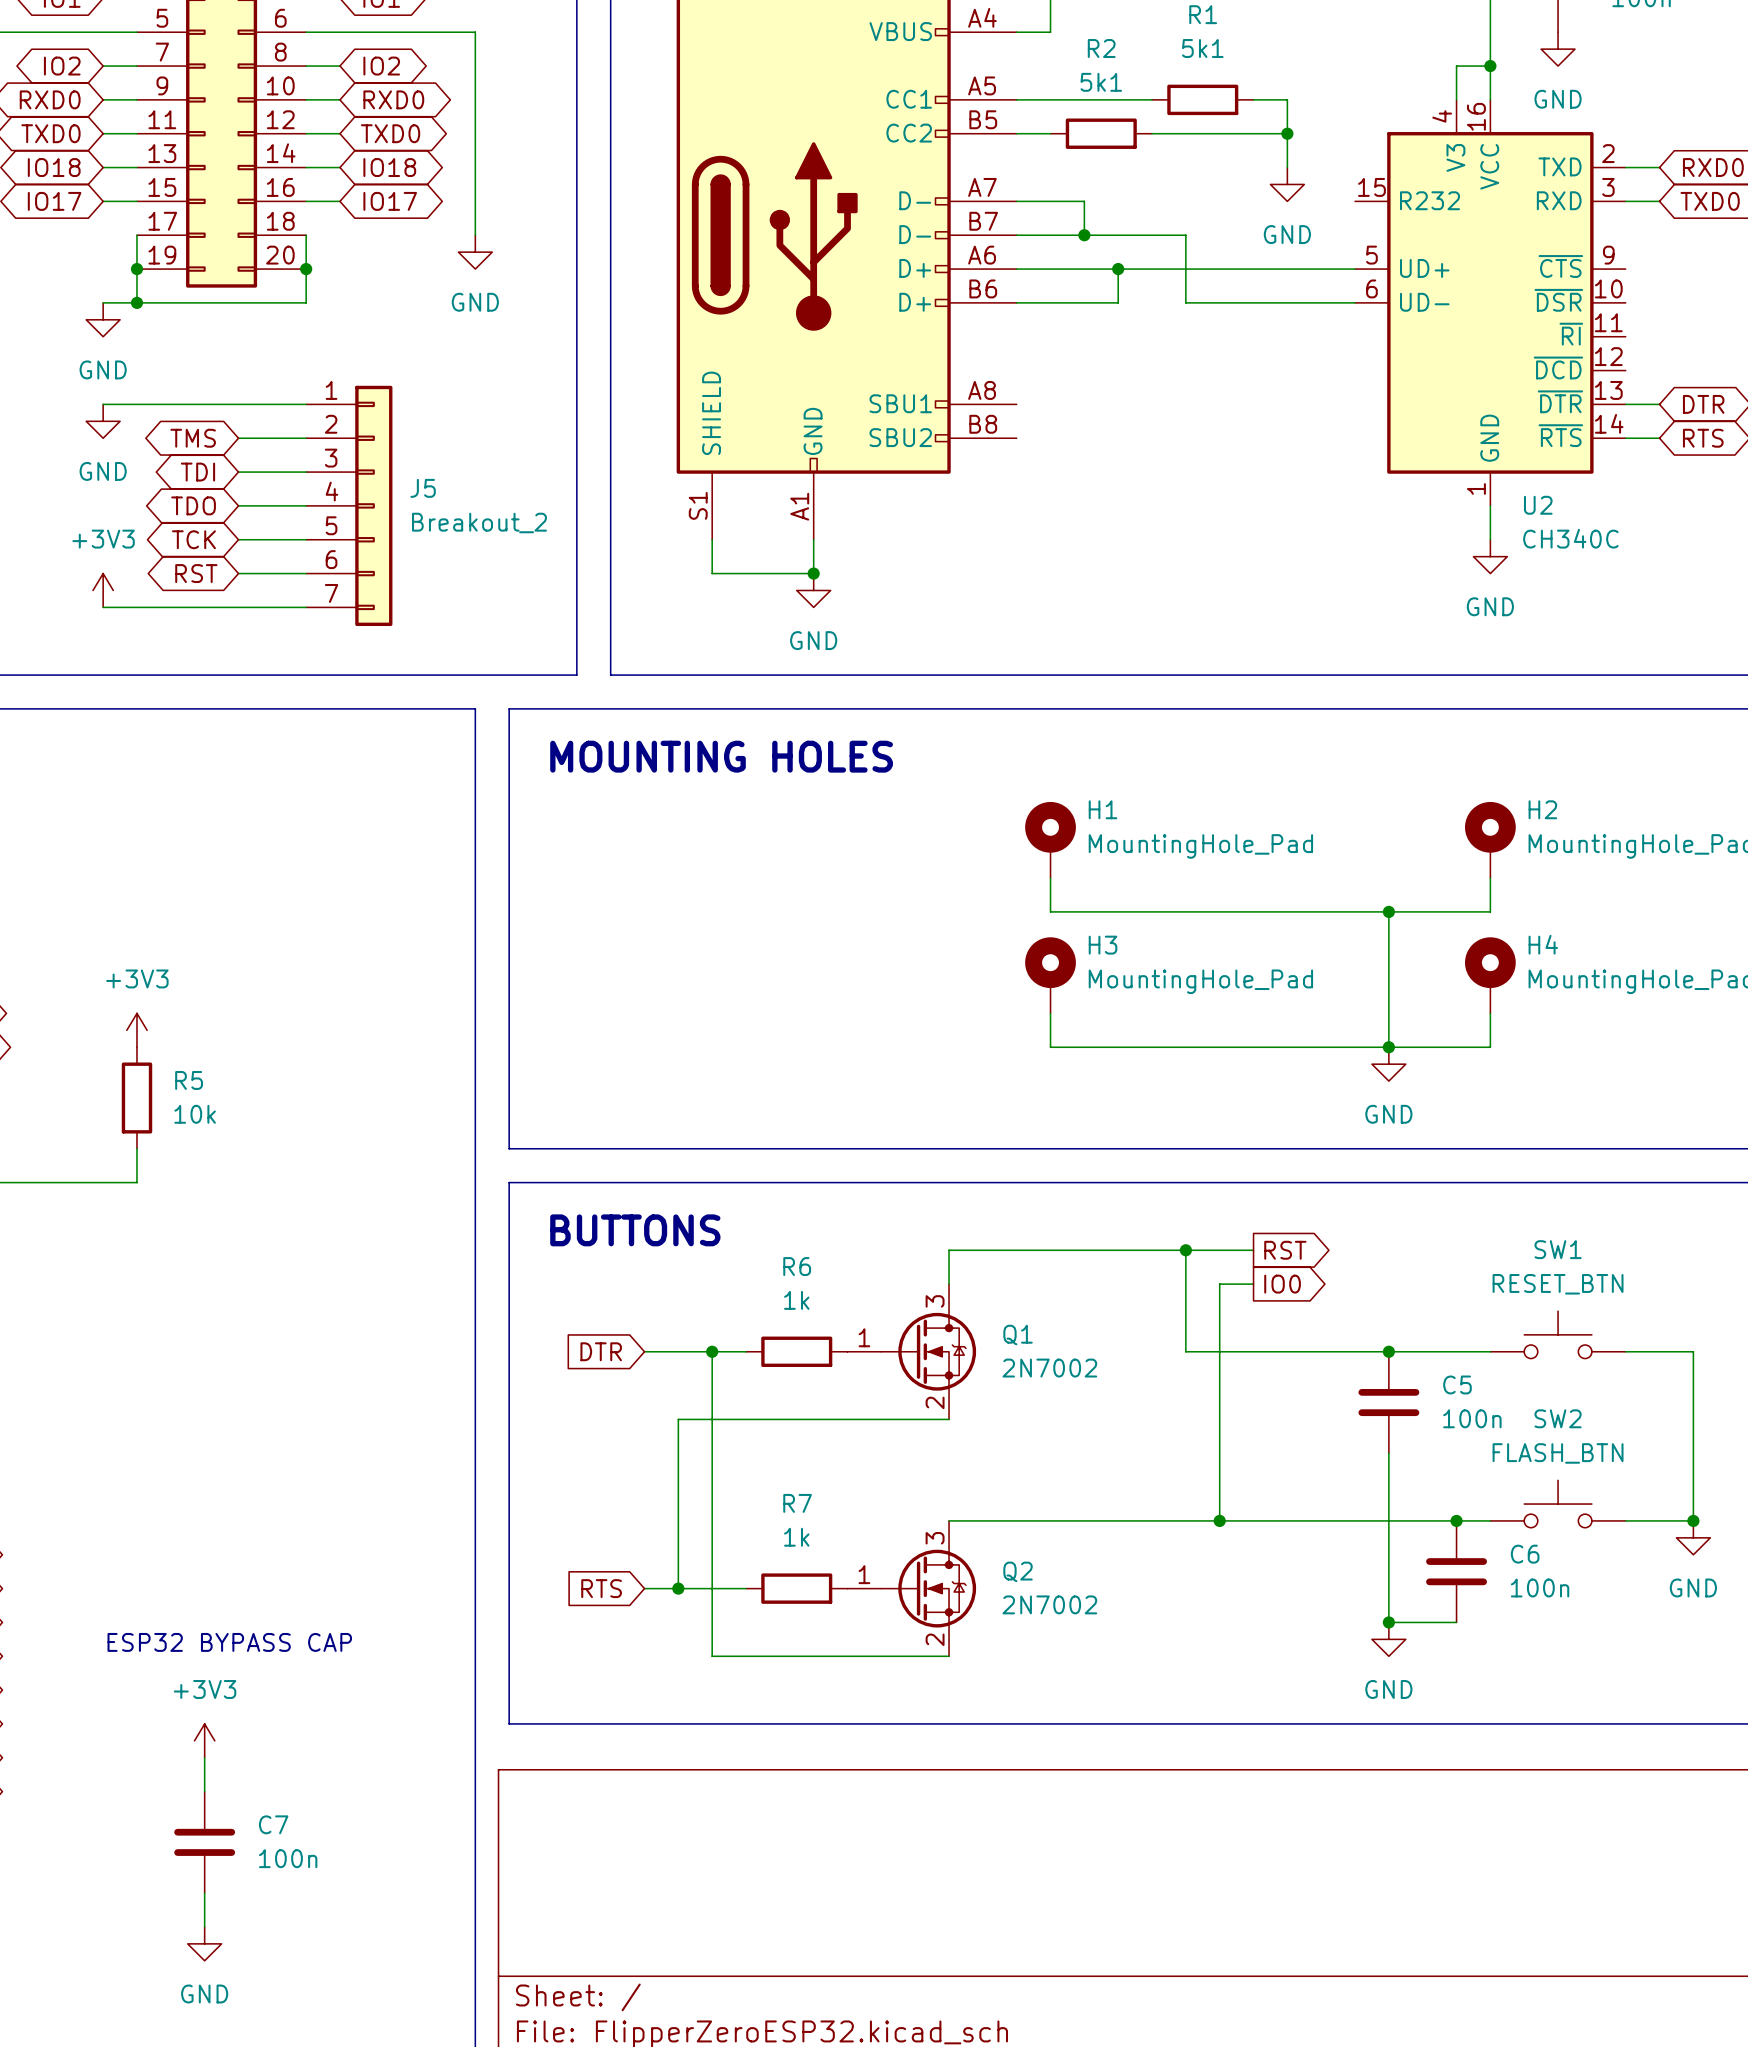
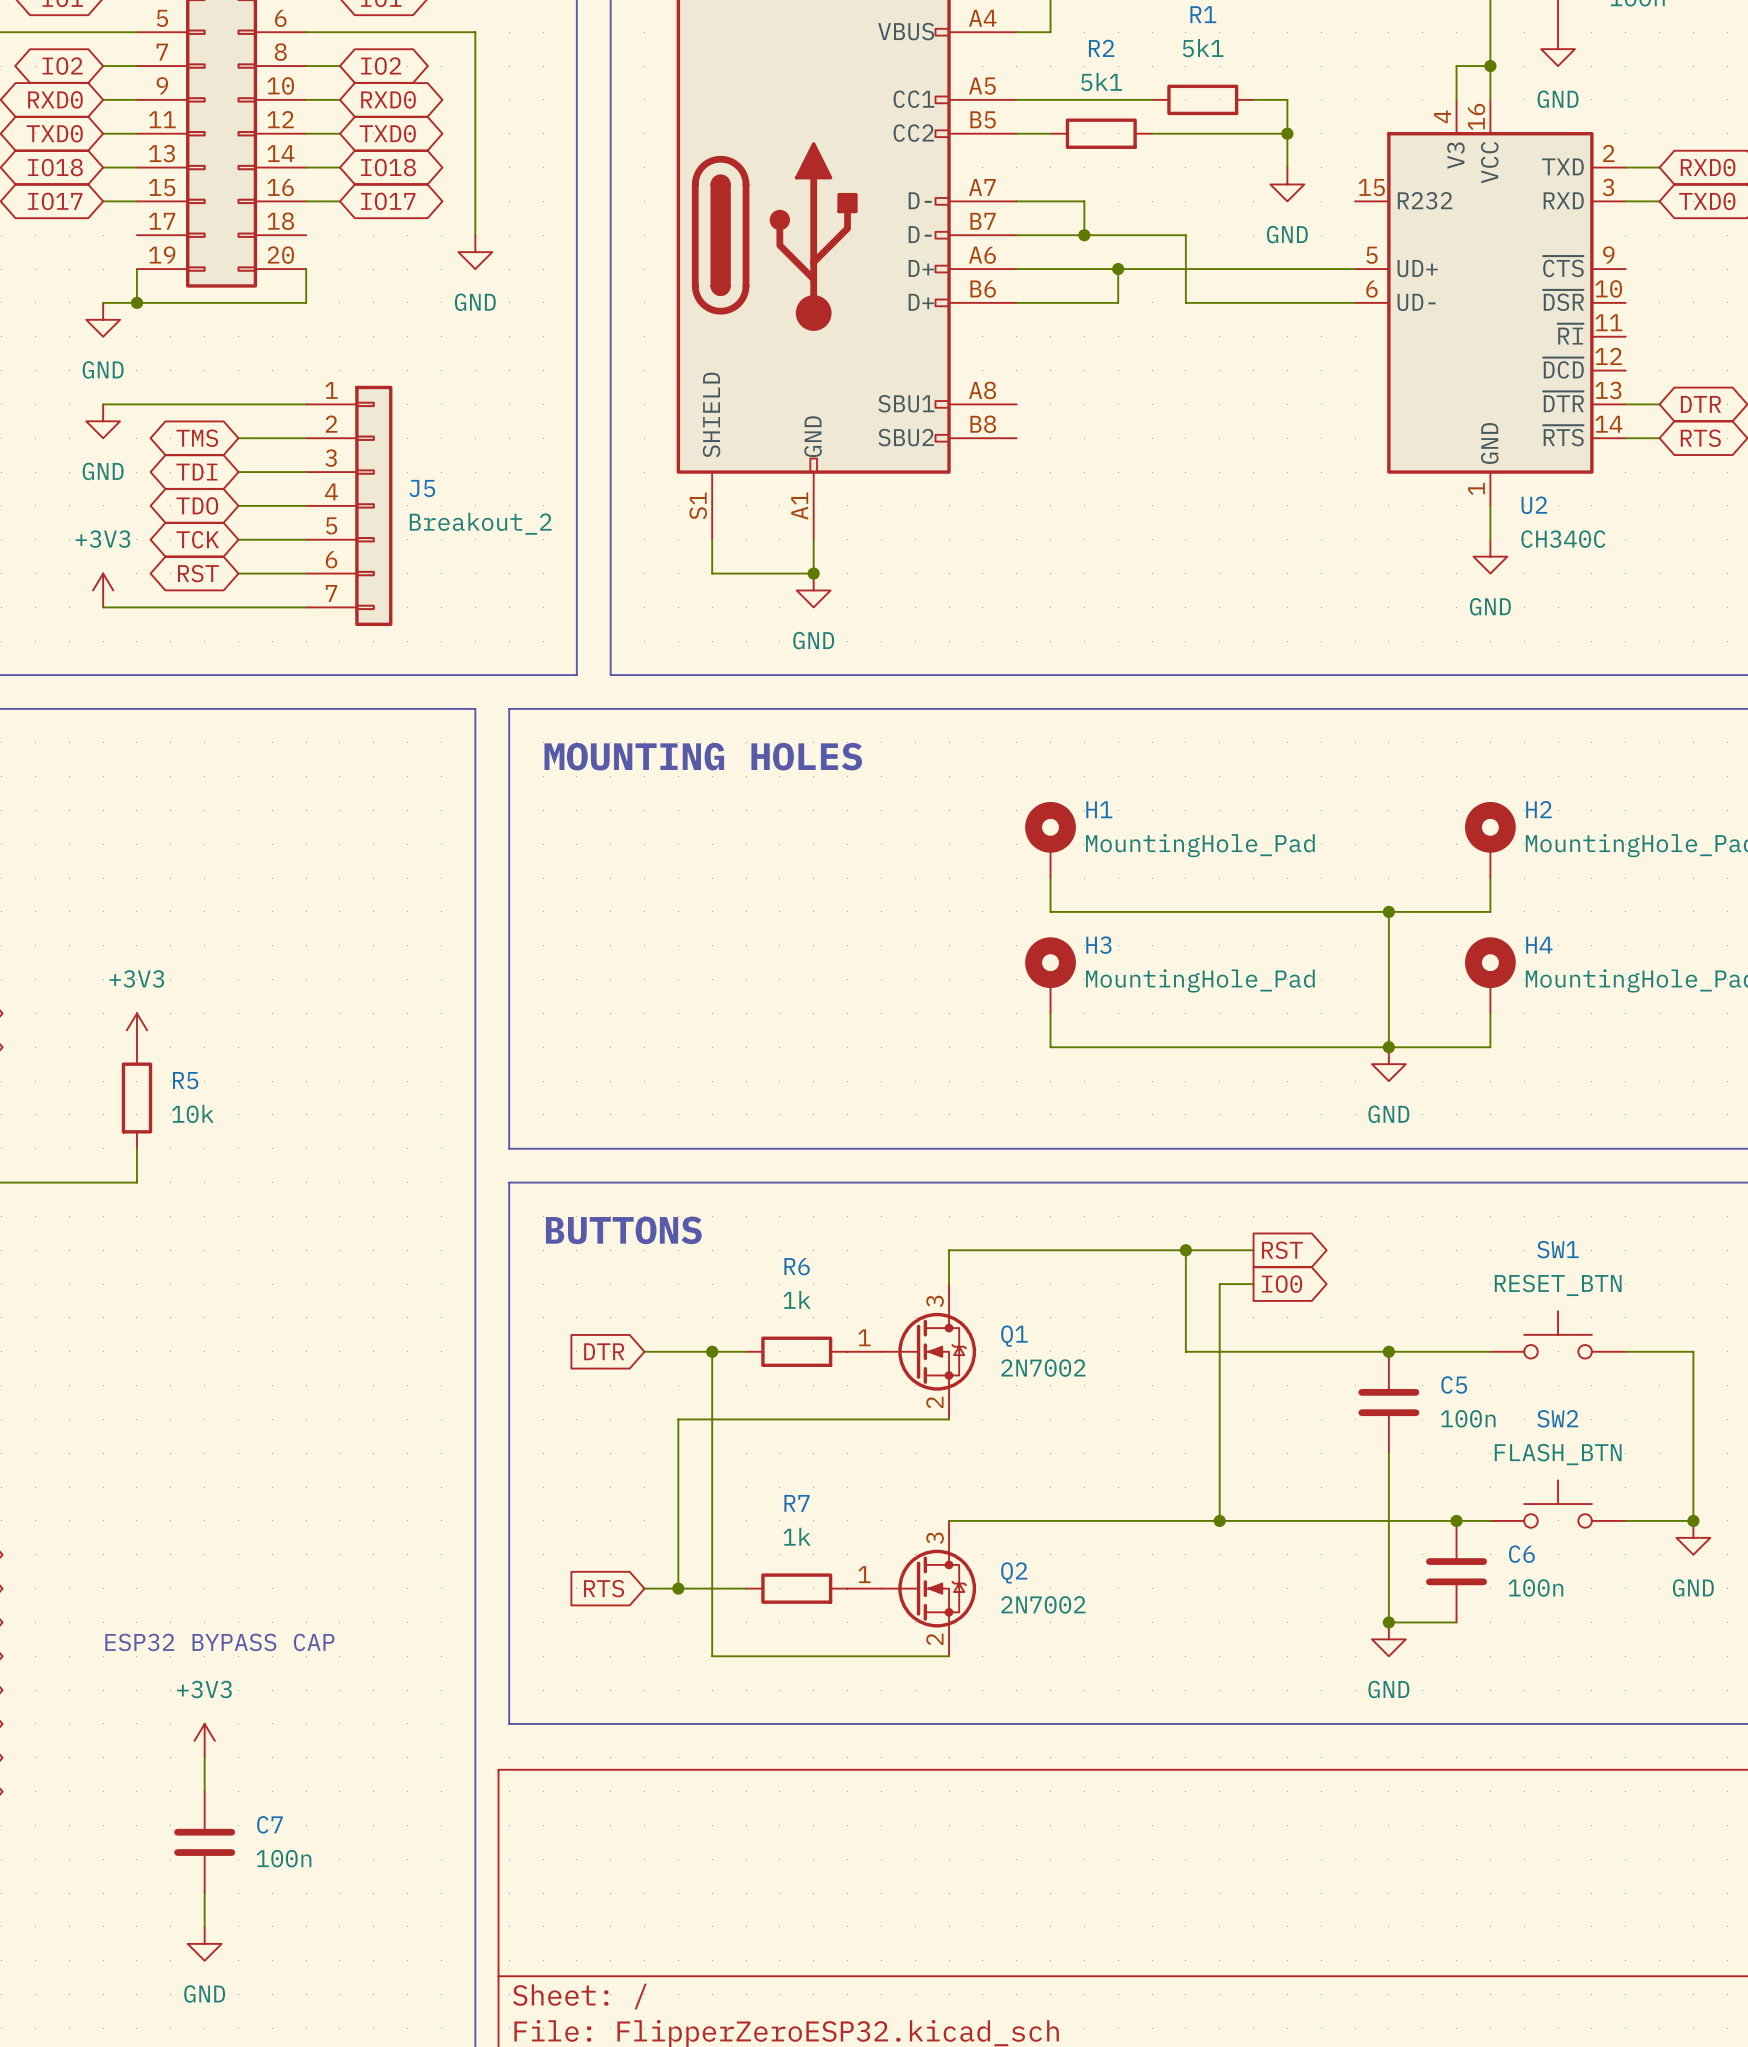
wire: (136, 235) (136, 269) -> none
wire: (306, 235) (306, 269) -> none
junction: (136, 269) -> none
junction: (306, 269) -> none

